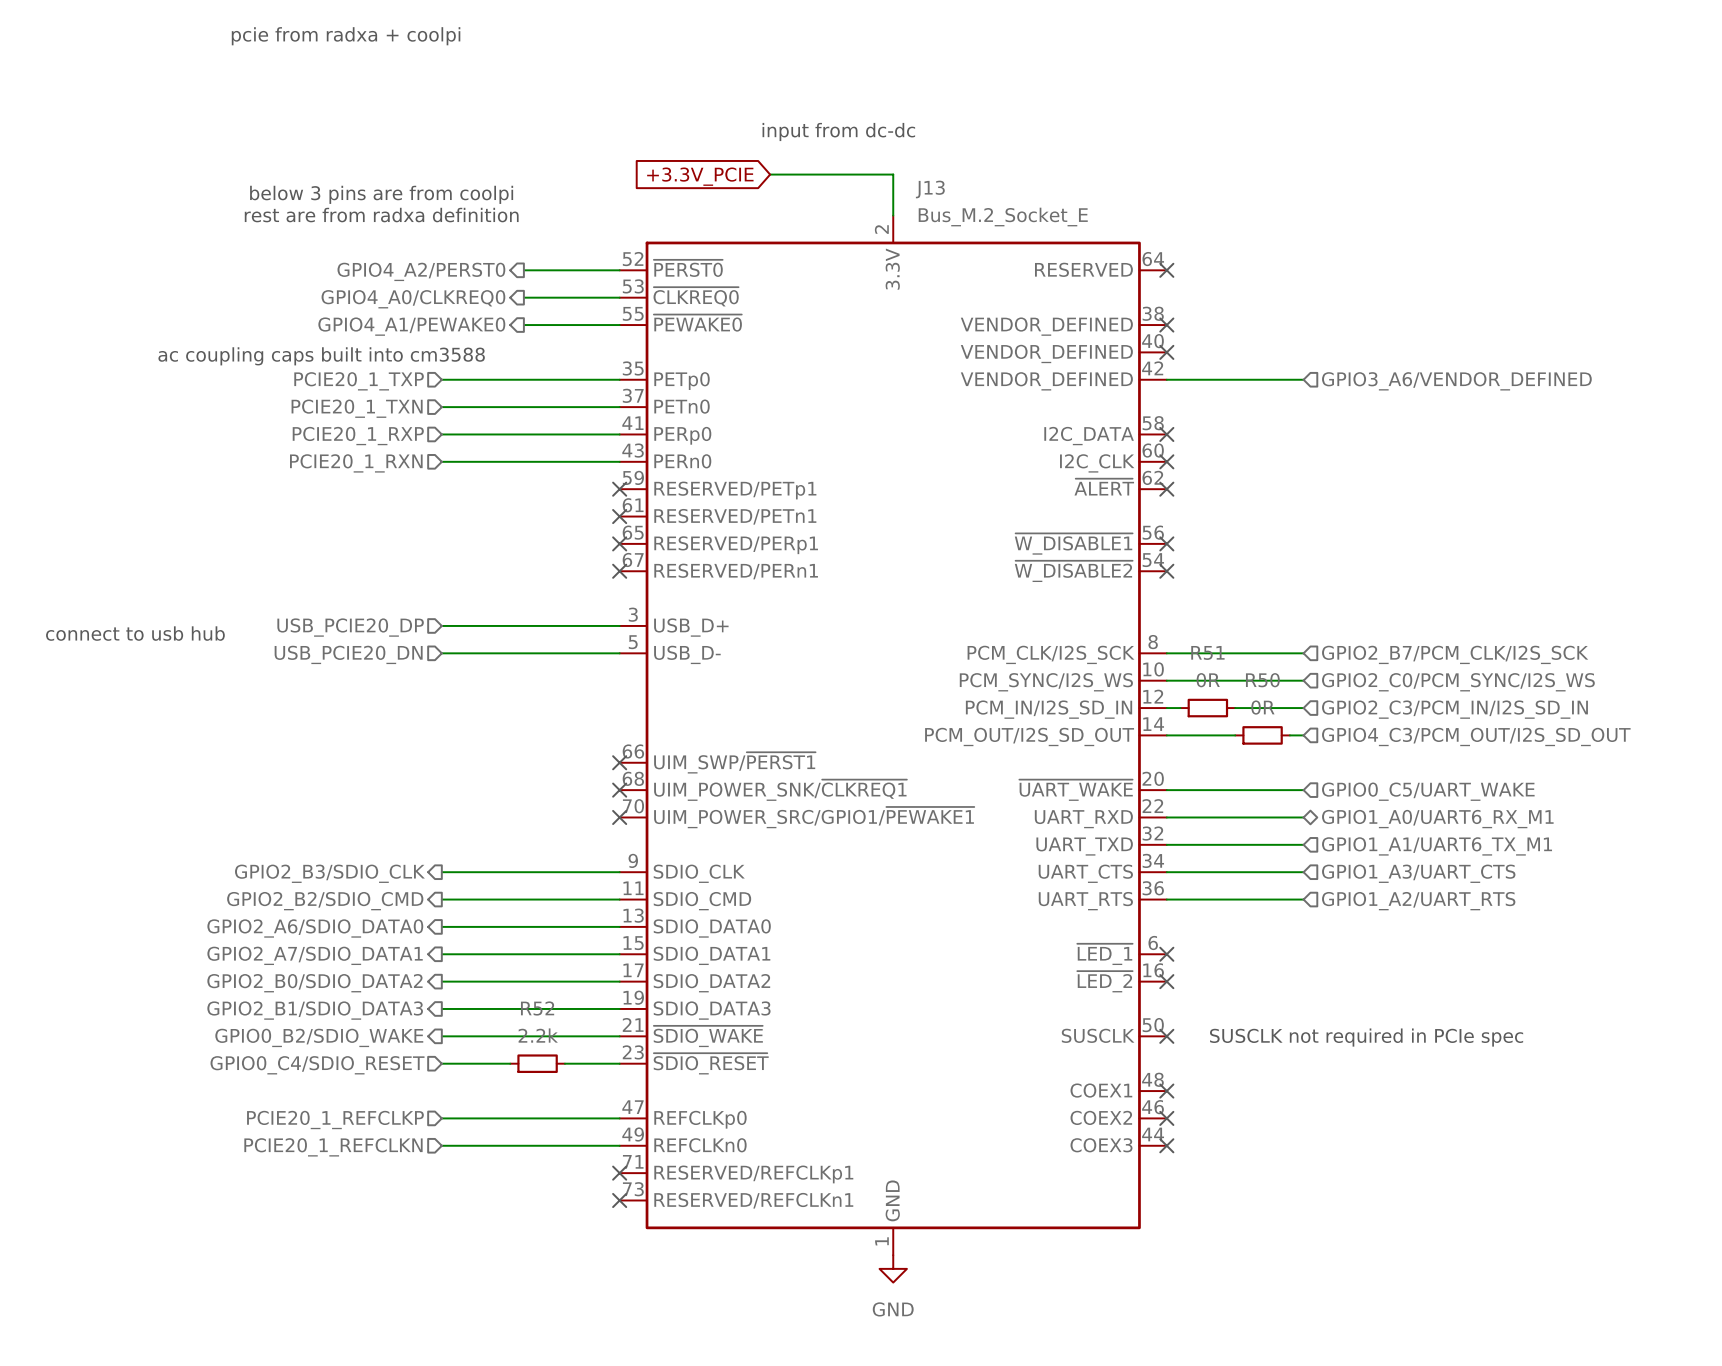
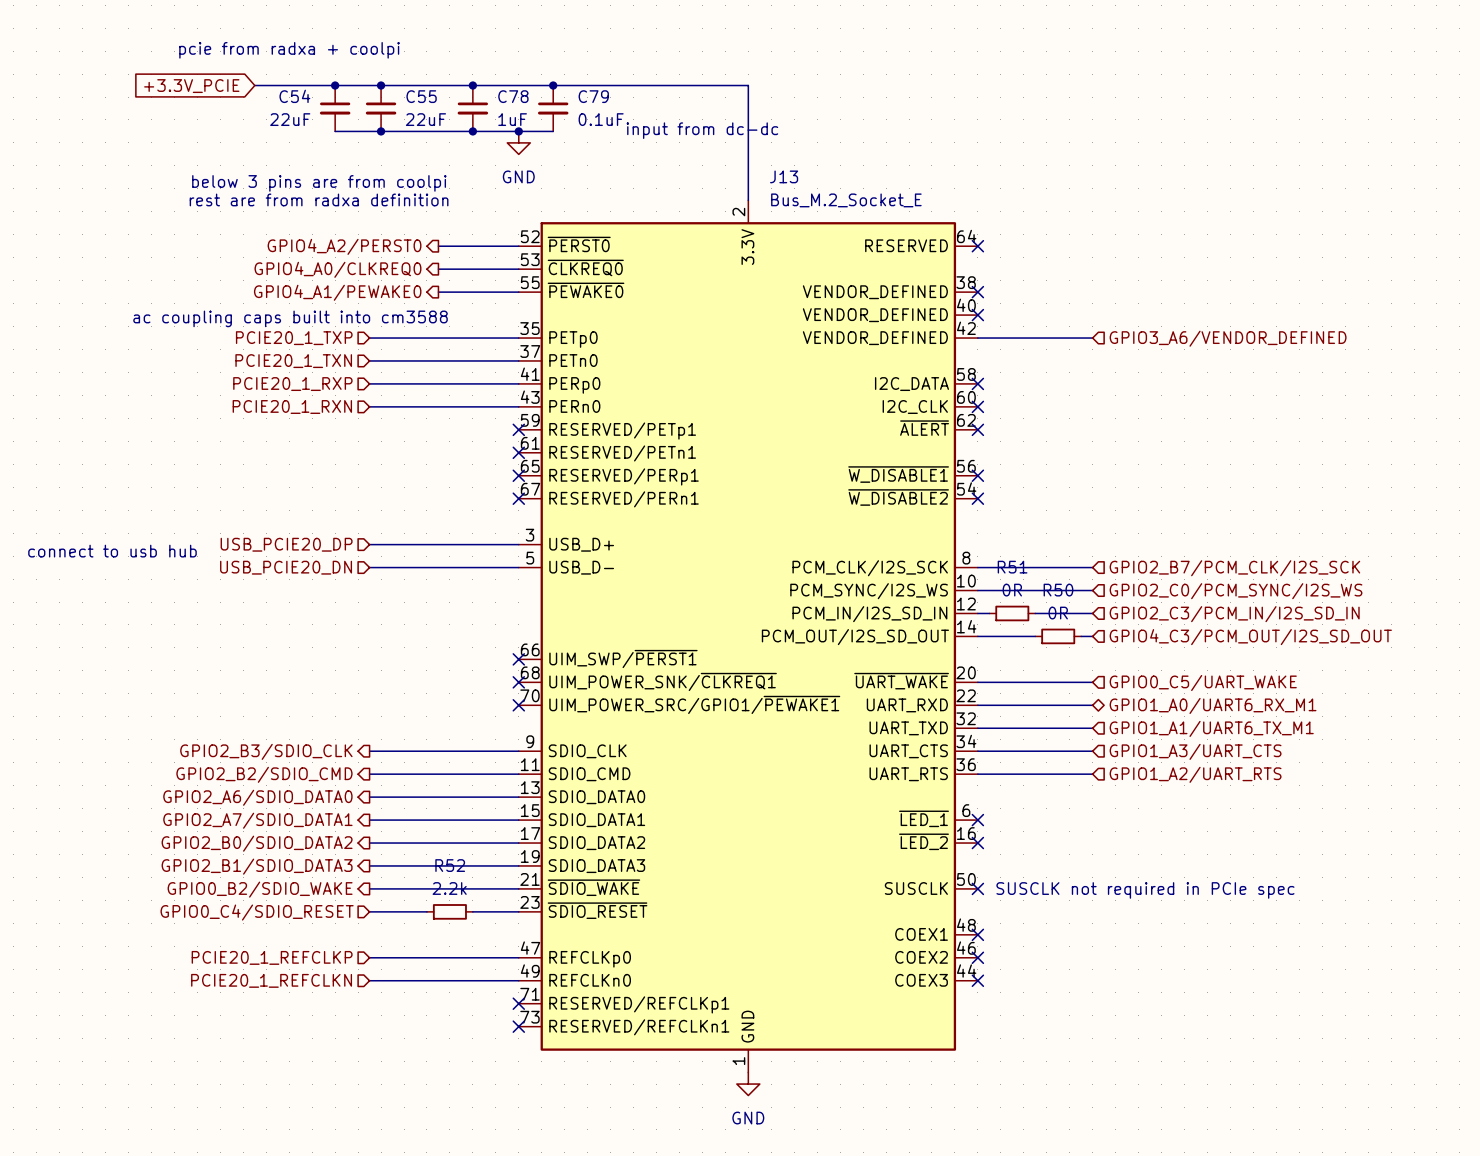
junction: none -> (335, 85)
junction: none -> (381, 85)
junction: none -> (472, 85)
junction: none -> (553, 85)
global label: none -> +3.3V_PCIE (191, 86)
C54: none -> 22uF (335, 108)
C55: none -> 22uF (381, 108)
C78: none -> 1uF (472, 108)
C79: none -> 0.1uF (553, 108)
wire: none -> (335, 131) (553, 131)
junction: none -> (381, 131)
junction: none -> (472, 131)
junction: none -> (518, 131)
power symbol: none -> GND (518, 142)
wire: (770, 174) (893, 174) -> (254, 85) (748, 85) (748, 165)
global label: +3.3V_PCIE (700, 176) -> none

